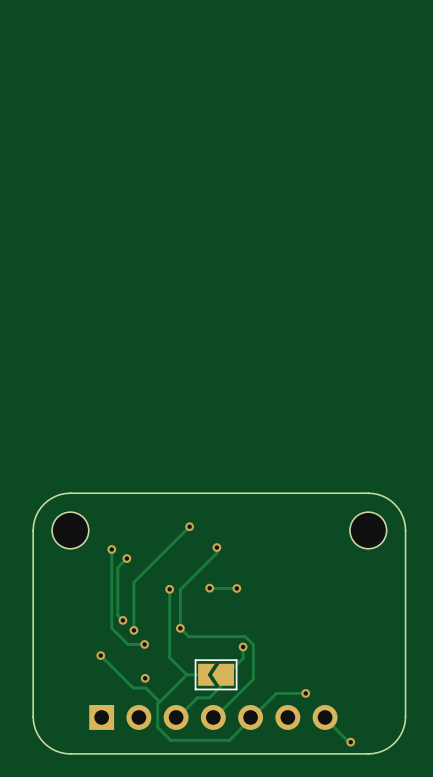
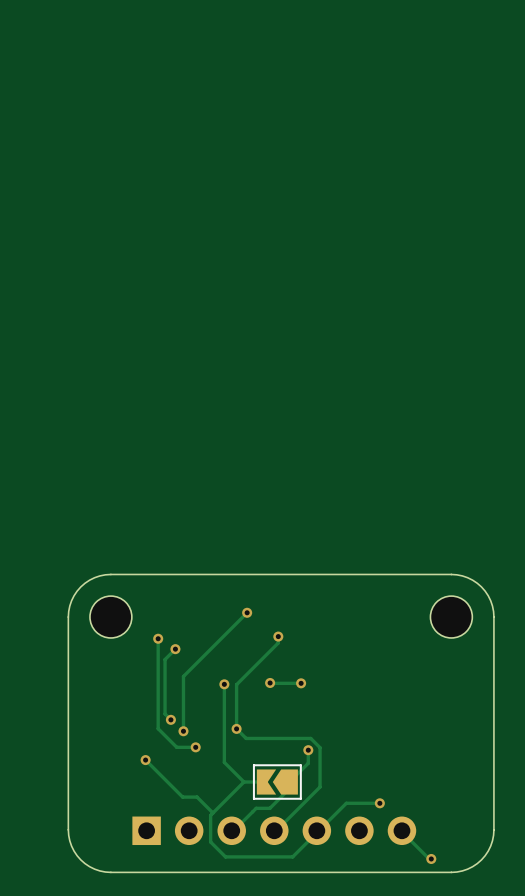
via: (145, 678) -> none

